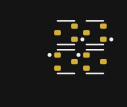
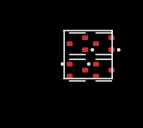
line: none -> (64, 30) (112, 30) (112, 78) (64, 78) (64, 30)

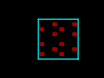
part footprint: [66, 32, 95, 56] -> [39, 22, 58, 37]
part footprint: [92, 32, 121, 56] -> [59, 22, 78, 37]
part footprint: [60, 58, 89, 82] -> [39, 42, 58, 57]
part footprint: [86, 58, 115, 82] -> [59, 42, 78, 57]

